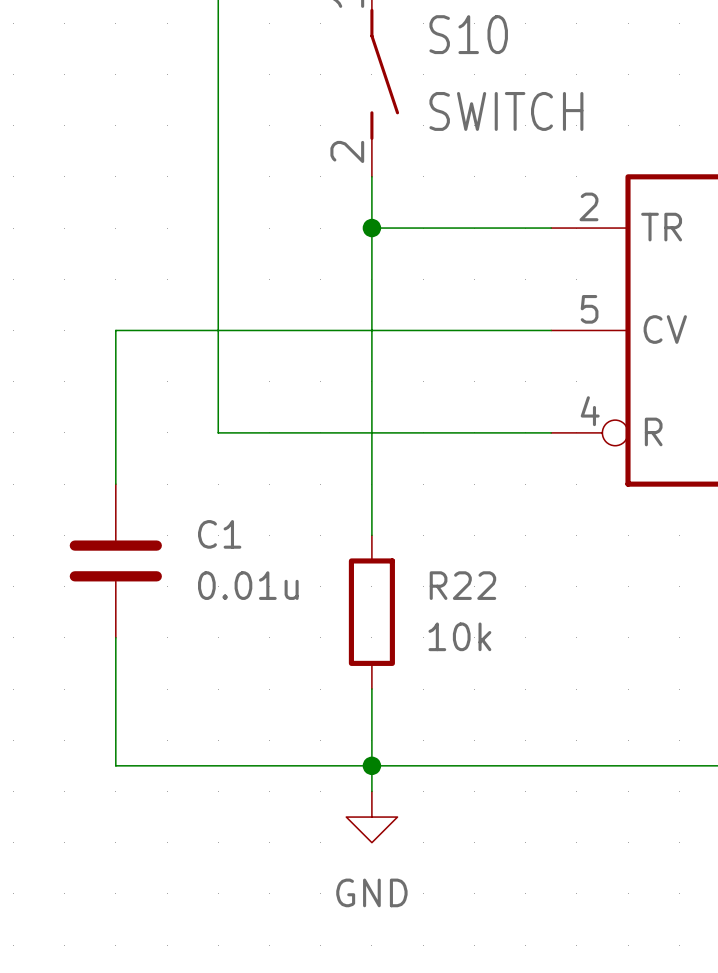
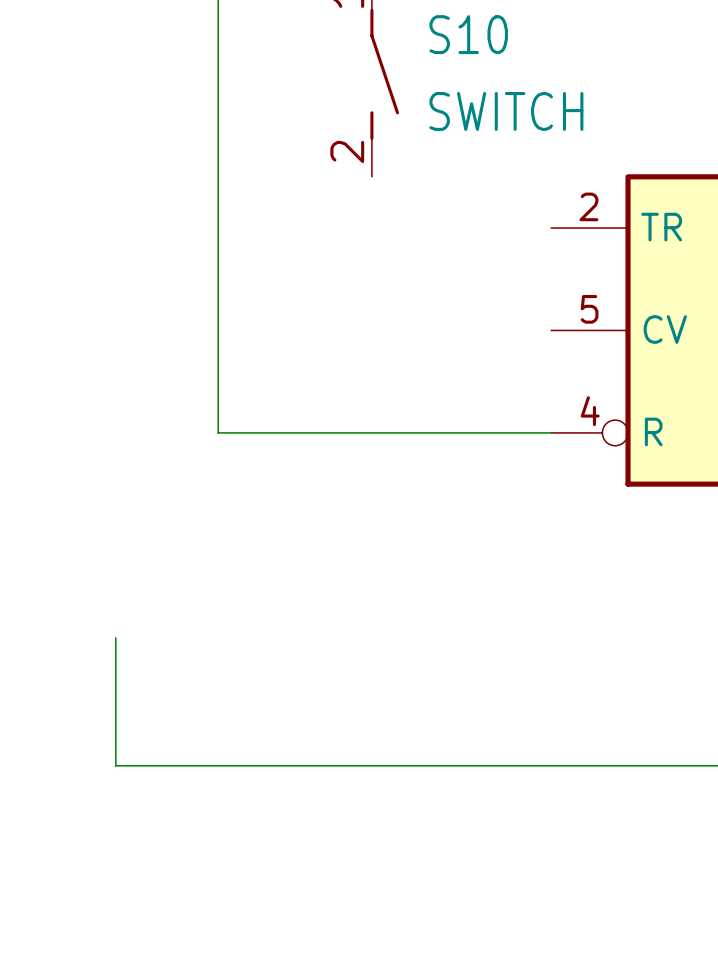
wire: (371, 176) (371, 535) -> none
wire: (371, 228) (551, 228) -> none
junction: (371, 228) -> none
wire: (551, 330) (115, 330) (115, 484) -> none
C1: 0.01u (115, 560) -> none
R22: 10k (371, 612) -> none
wire: (371, 689) (371, 791) -> none
junction: (371, 765) -> none
power symbol: GND (371, 817) -> none

